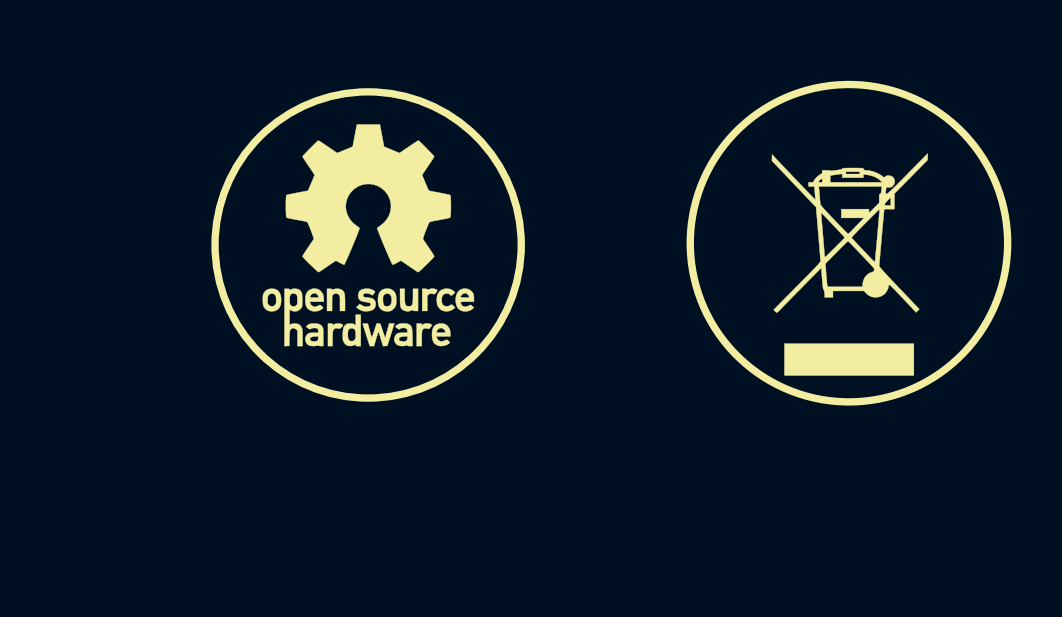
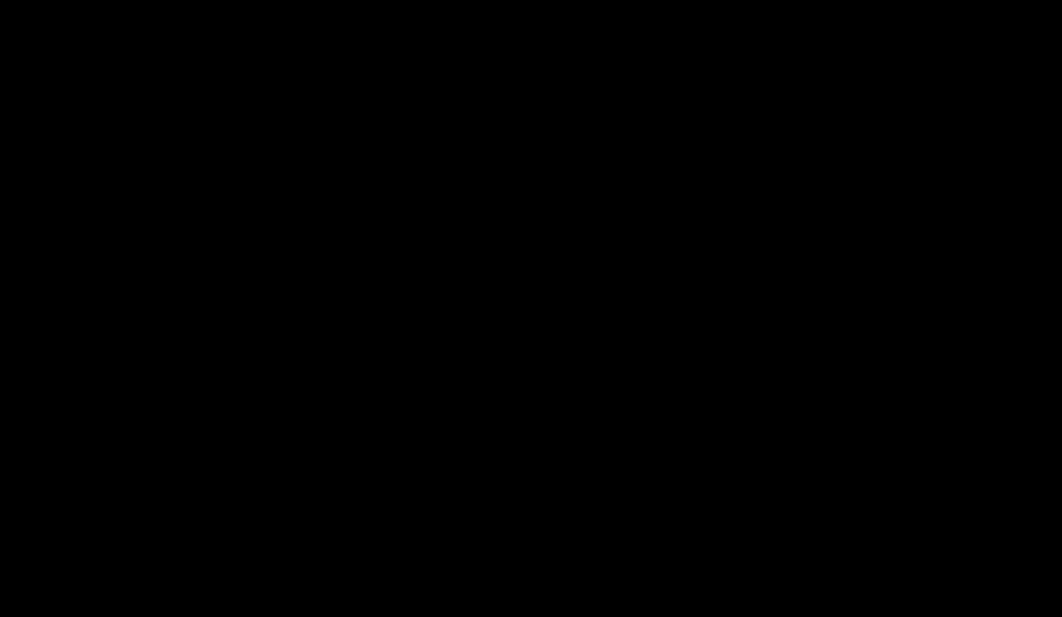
drawing: [686, 80, 1012, 406] -> none
drawing: [211, 88, 525, 402] -> none

